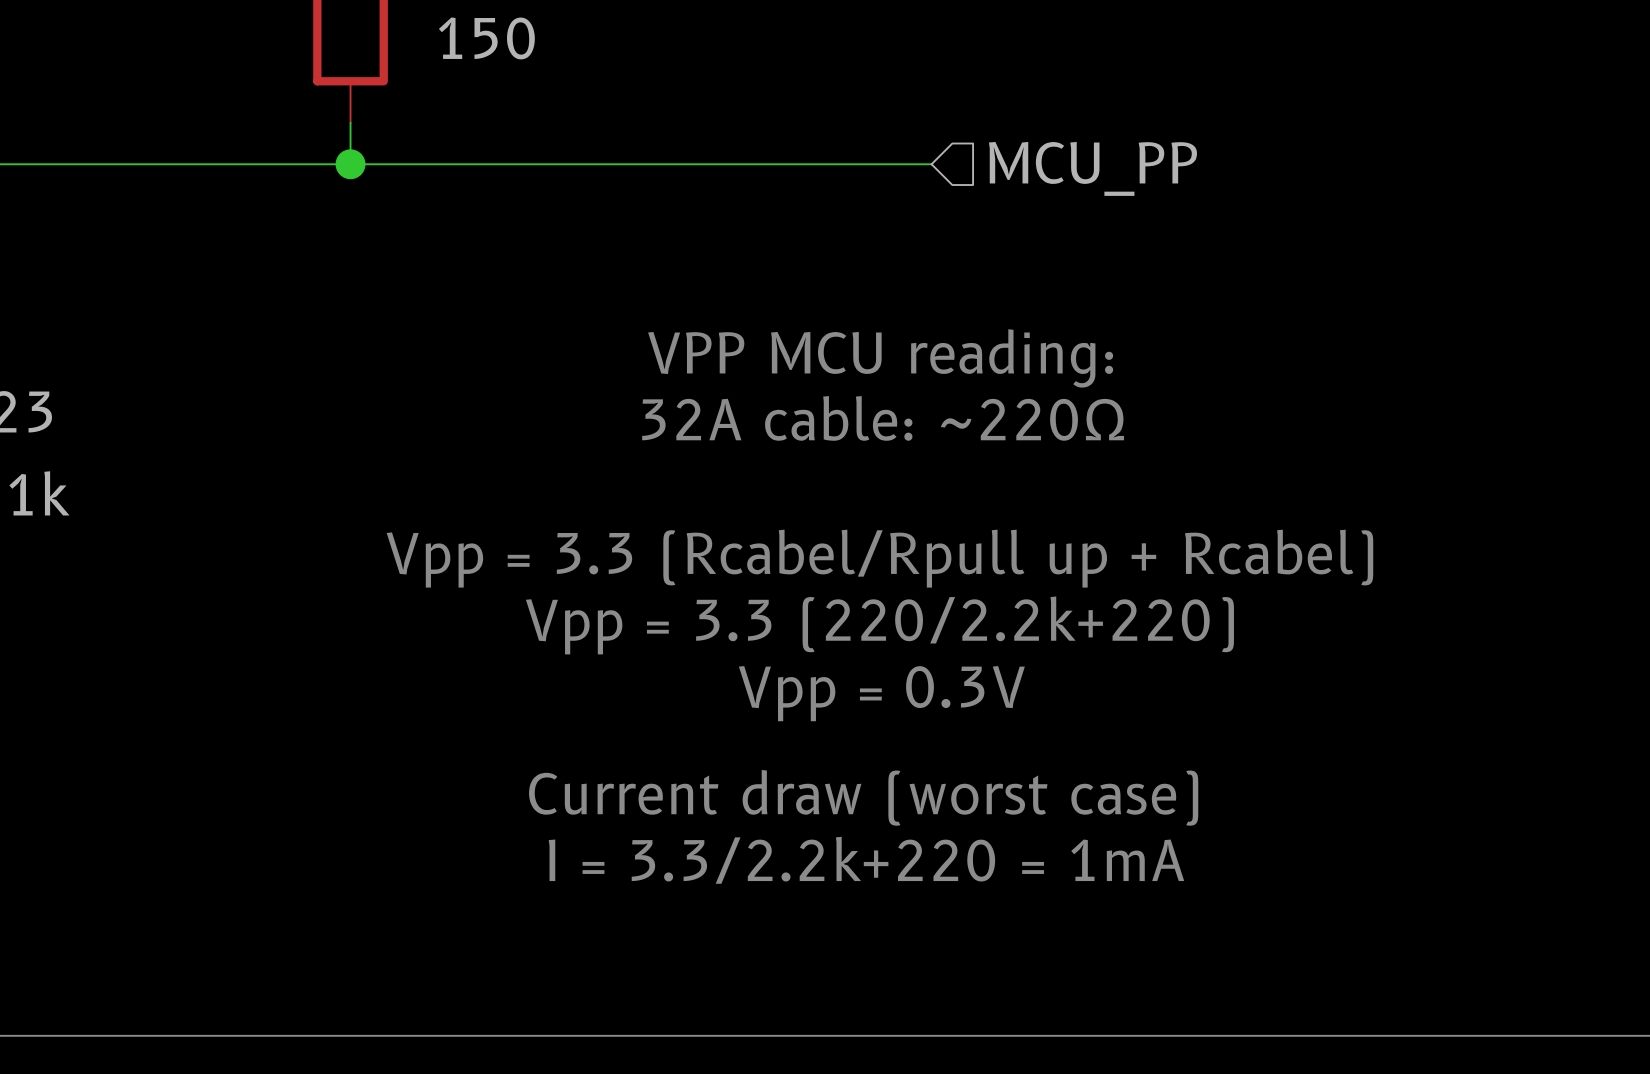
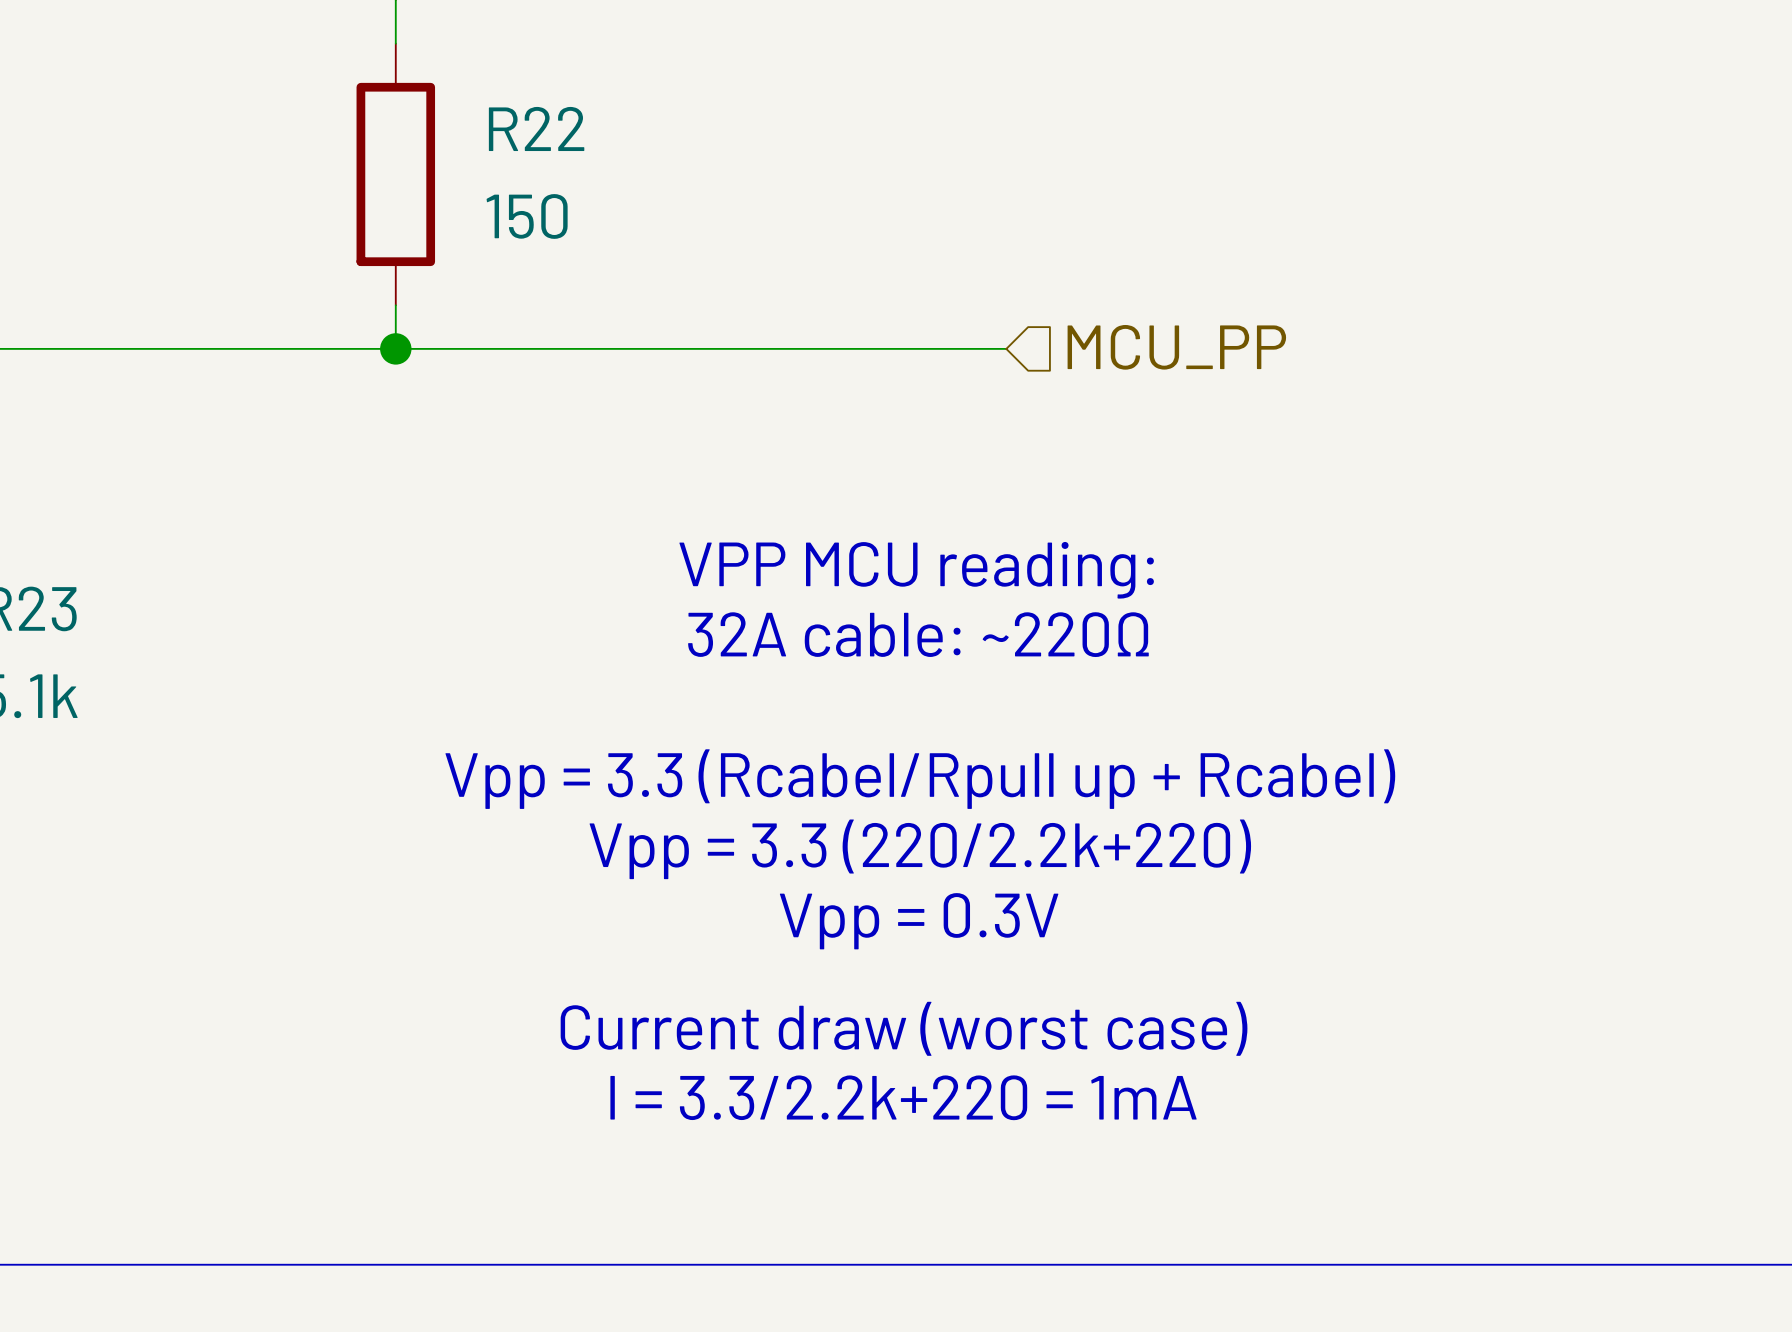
text position: VPP MCU reading: (880, 358) -> VPP MCU reading: (916, 570)
text position: 32A cable: ~220Ω (883, 418) -> 32A cable: ~220Ω (918, 634)
text position: Vpp = 3.3 (Rcabel/Rpull up + Rcabel) (879, 558) -> Vpp = 3.3 (Rcabel/Rpull up + Rcabel) (920, 779)
text position: Vpp = 3.3 (220/2.2k+220) (879, 625) -> Vpp = 3.3 (220/2.2k+220) (920, 849)
text position: Vpp = 0.3V (881, 693) -> Vpp = 0.3V (919, 921)
text position: Current draw (worst case) (863, 797) -> Current draw (worst case) (904, 1028)
text position: I = 3.3/2.2k+220 = 1mA (866, 860) -> I = 3.3/2.2k+220 = 1mA (903, 1097)

